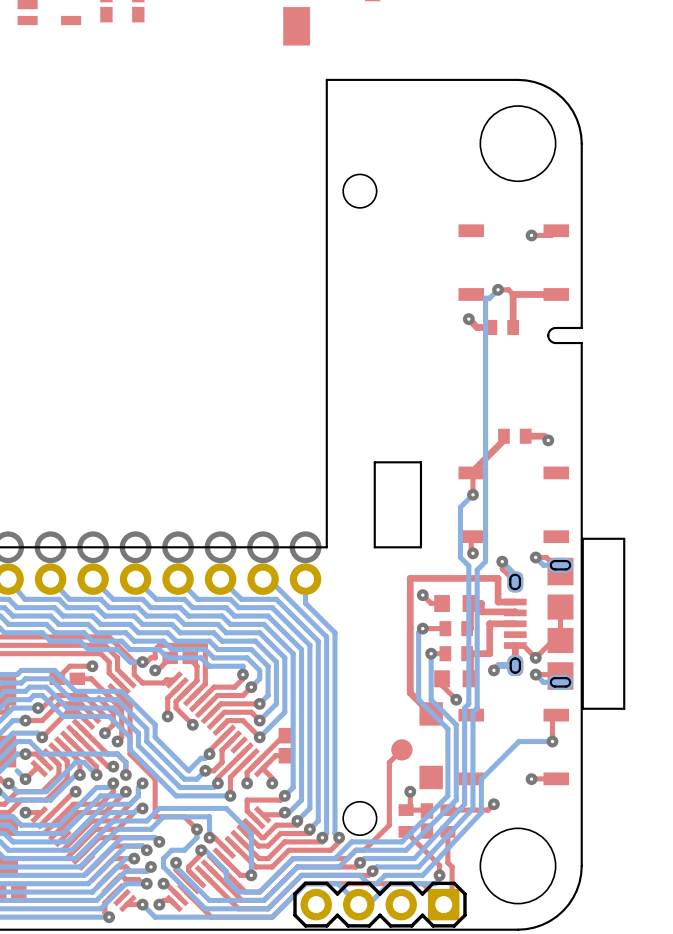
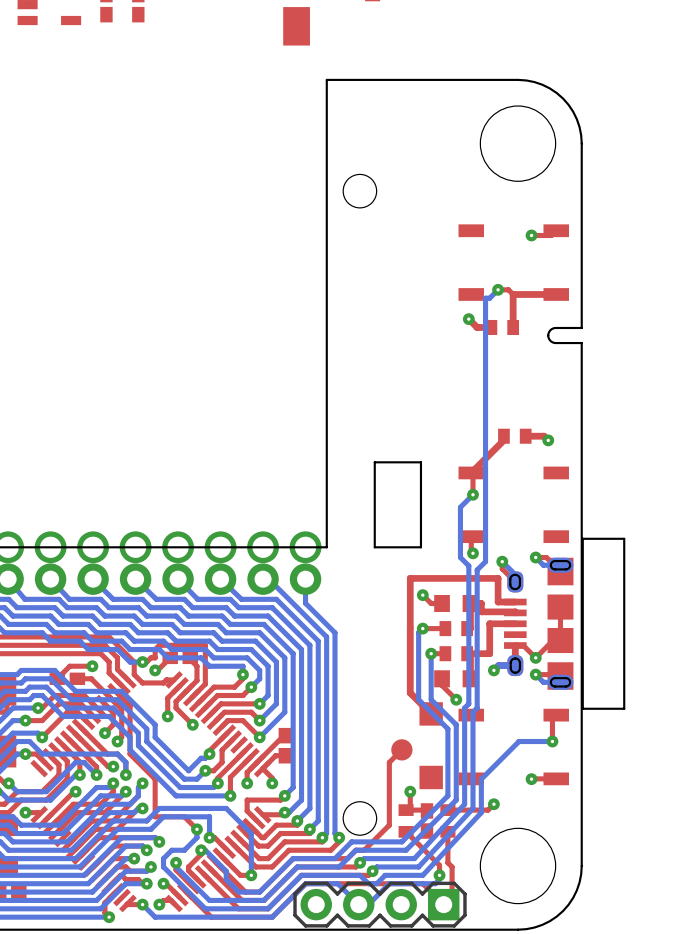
top track: (39, 768) (36, 768) (25, 779) -> none
bottom track: (17, 770) (25, 779) -> none
via: (25, 779) -> none

